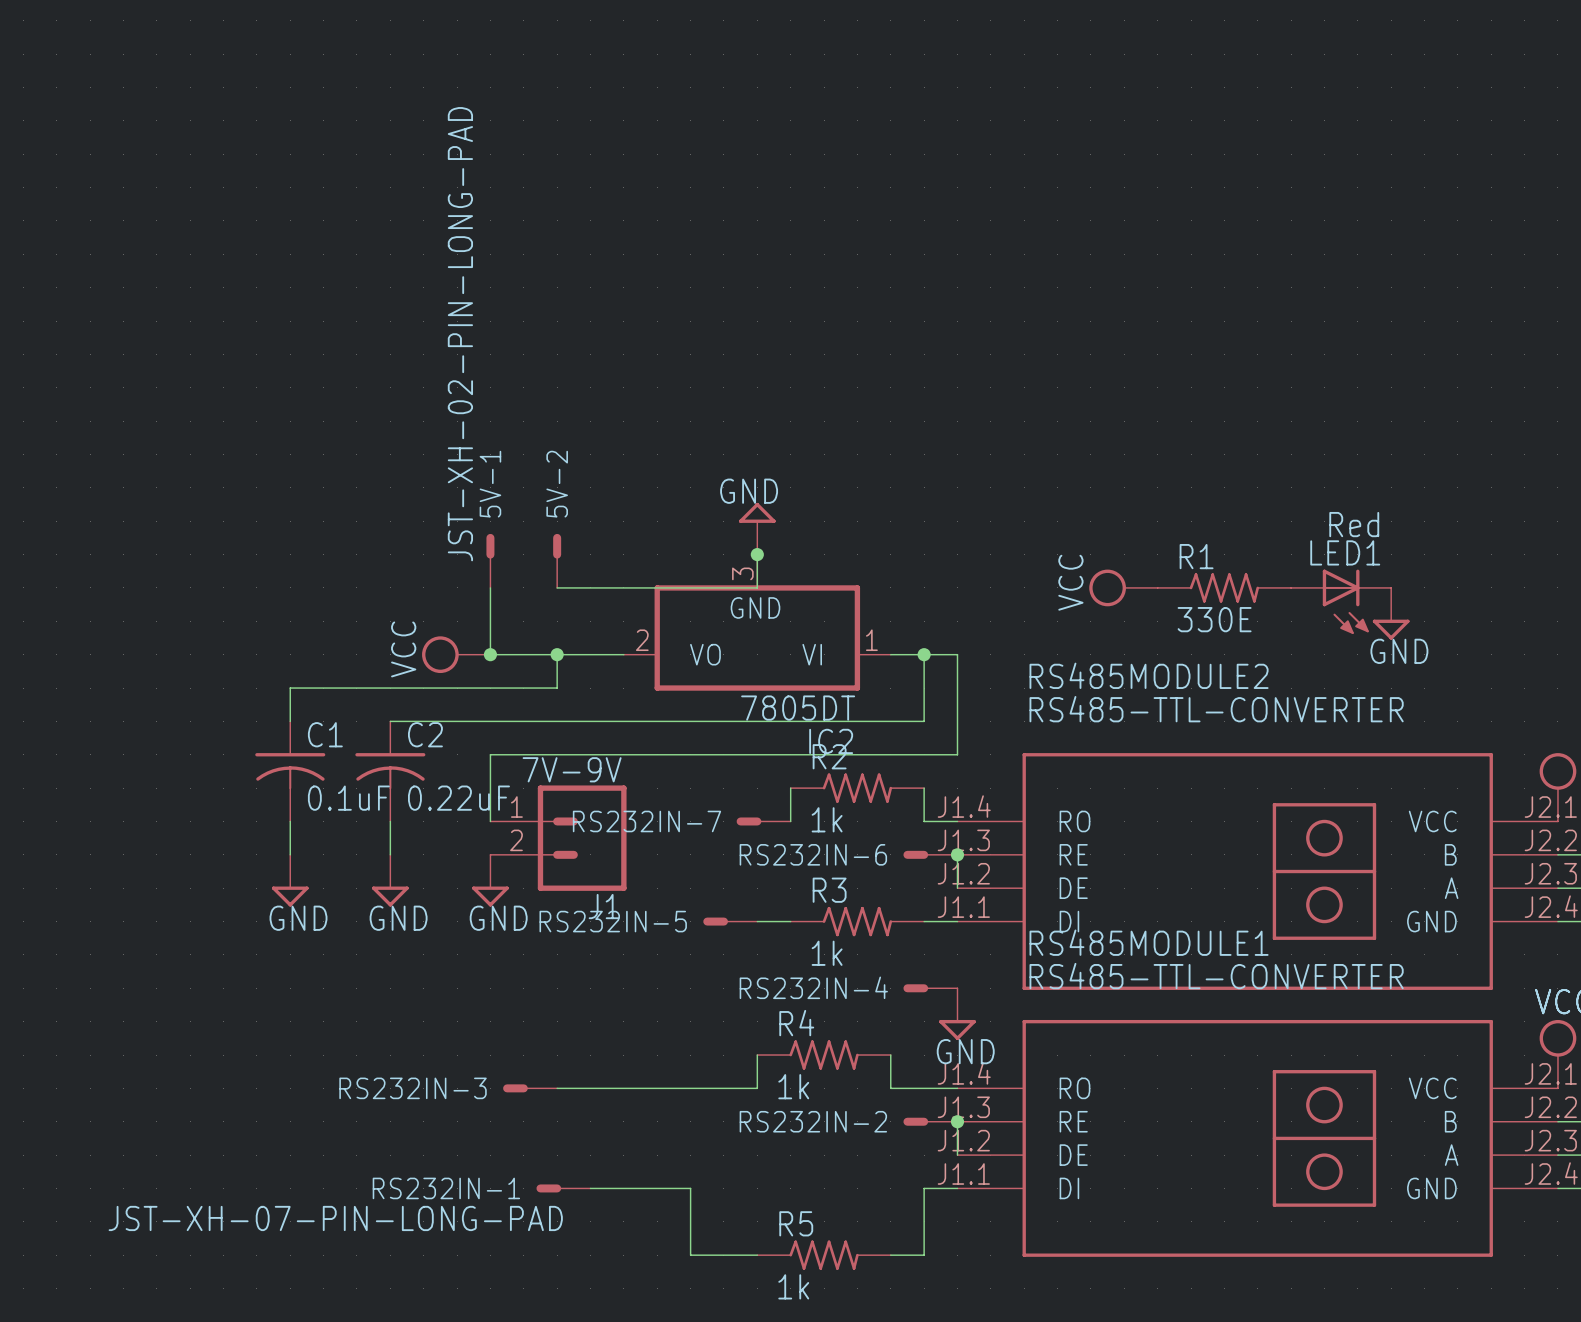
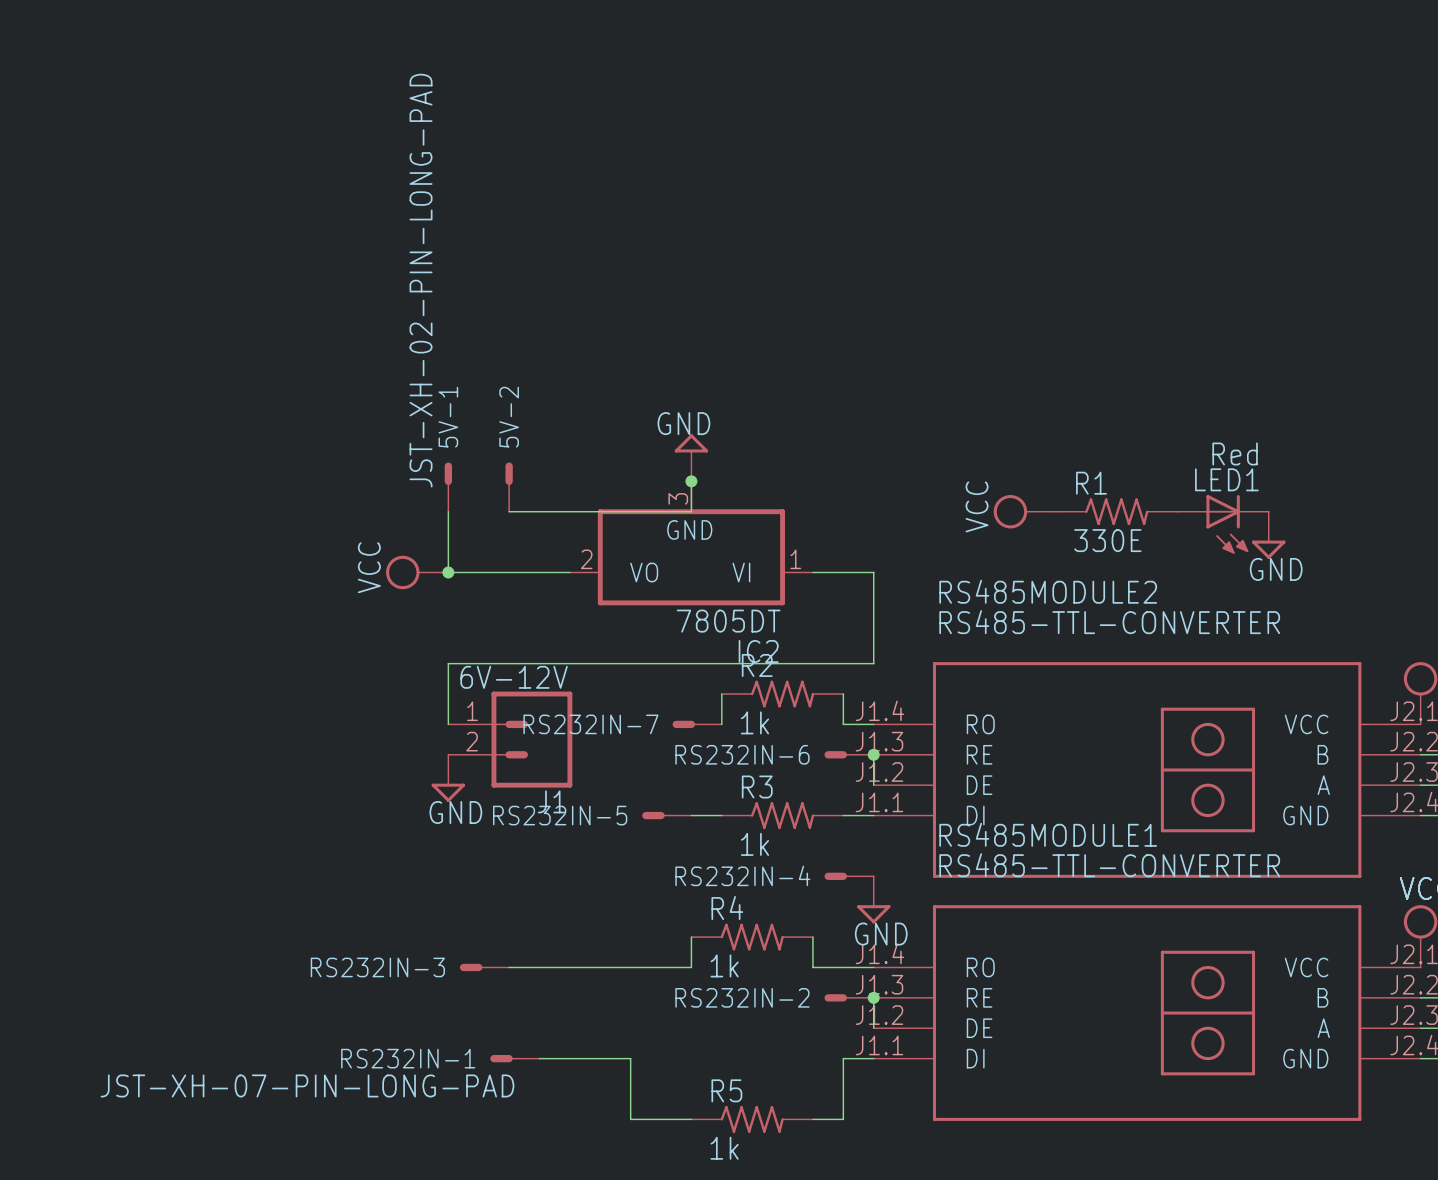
wire: (557, 654) (557, 688) (290, 688) (290, 721) -> none
junction: (557, 654) -> none
wire: (924, 654) (924, 721) (390, 721) -> none
junction: (924, 654) -> none
J1 value: 7V-9V (572, 769) -> 6V-12V (514, 677)
C1: 0.1uF (290, 771) -> none
C2: 0.22uF (390, 771) -> none
wire: (290, 821) (290, 854) -> none
wire: (390, 821) (390, 854) -> none
power symbol: GND (290, 880) -> none
power symbol: GND (390, 880) -> none

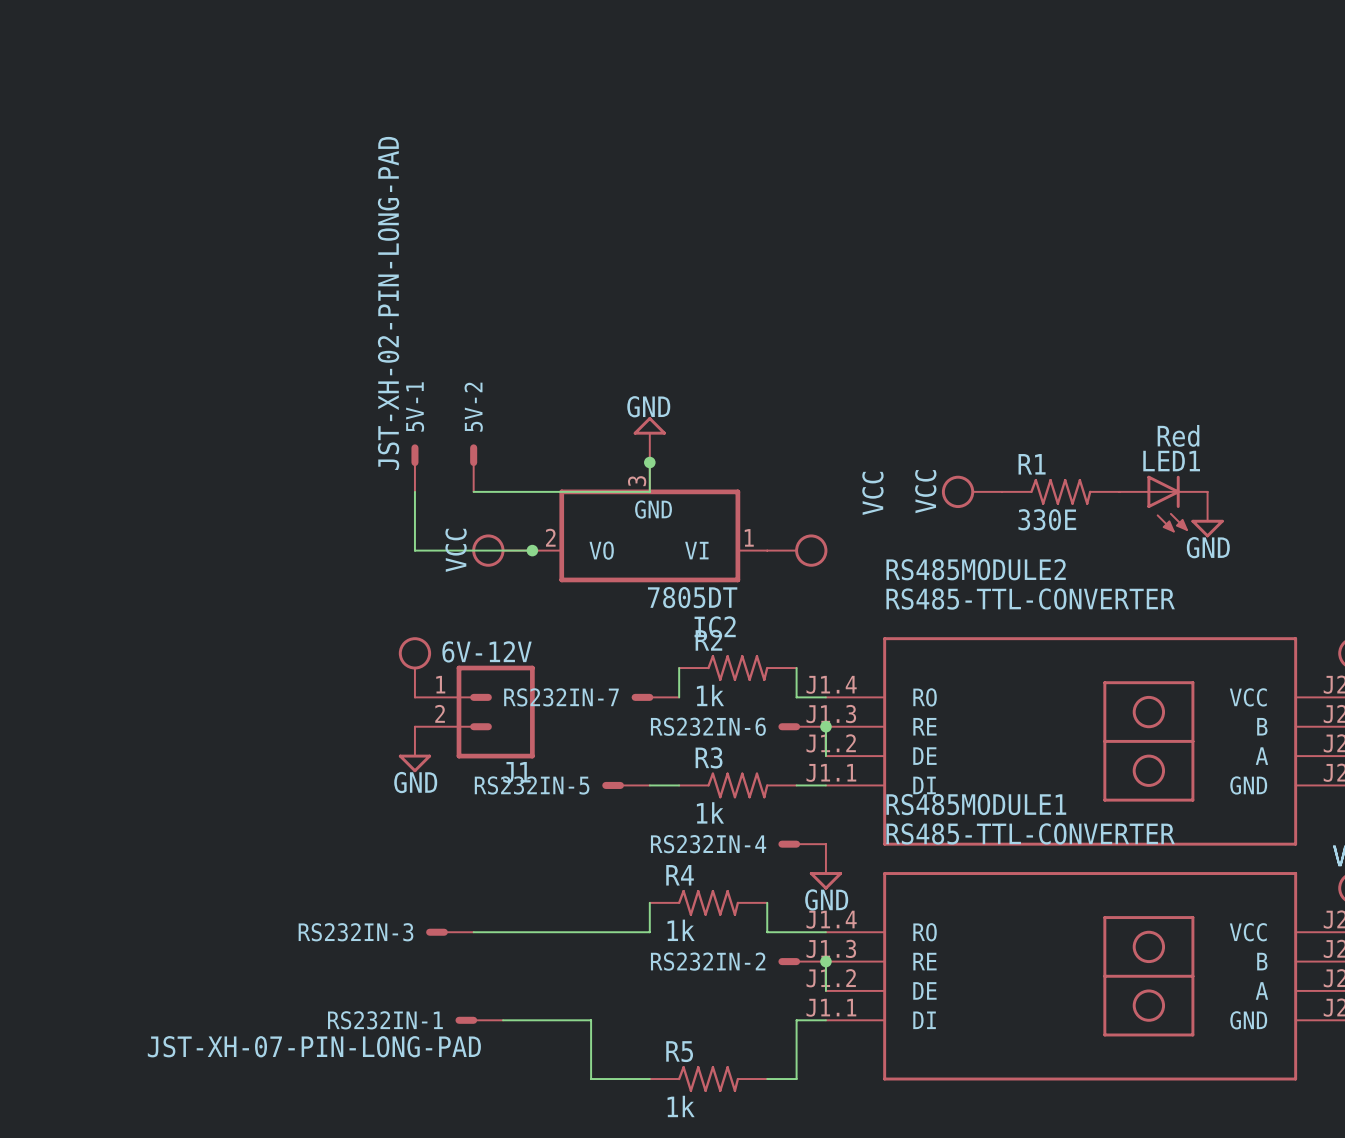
power symbol position: VCC (417, 572) -> VCC (502, 550)
junction: (448, 572) -> none
junction: none -> (532, 550)
wire: (812, 572) (873, 572) (873, 663) (448, 663) (448, 724) -> none
power symbol: none -> VCC (797, 550)
power symbol: none -> (414, 667)

